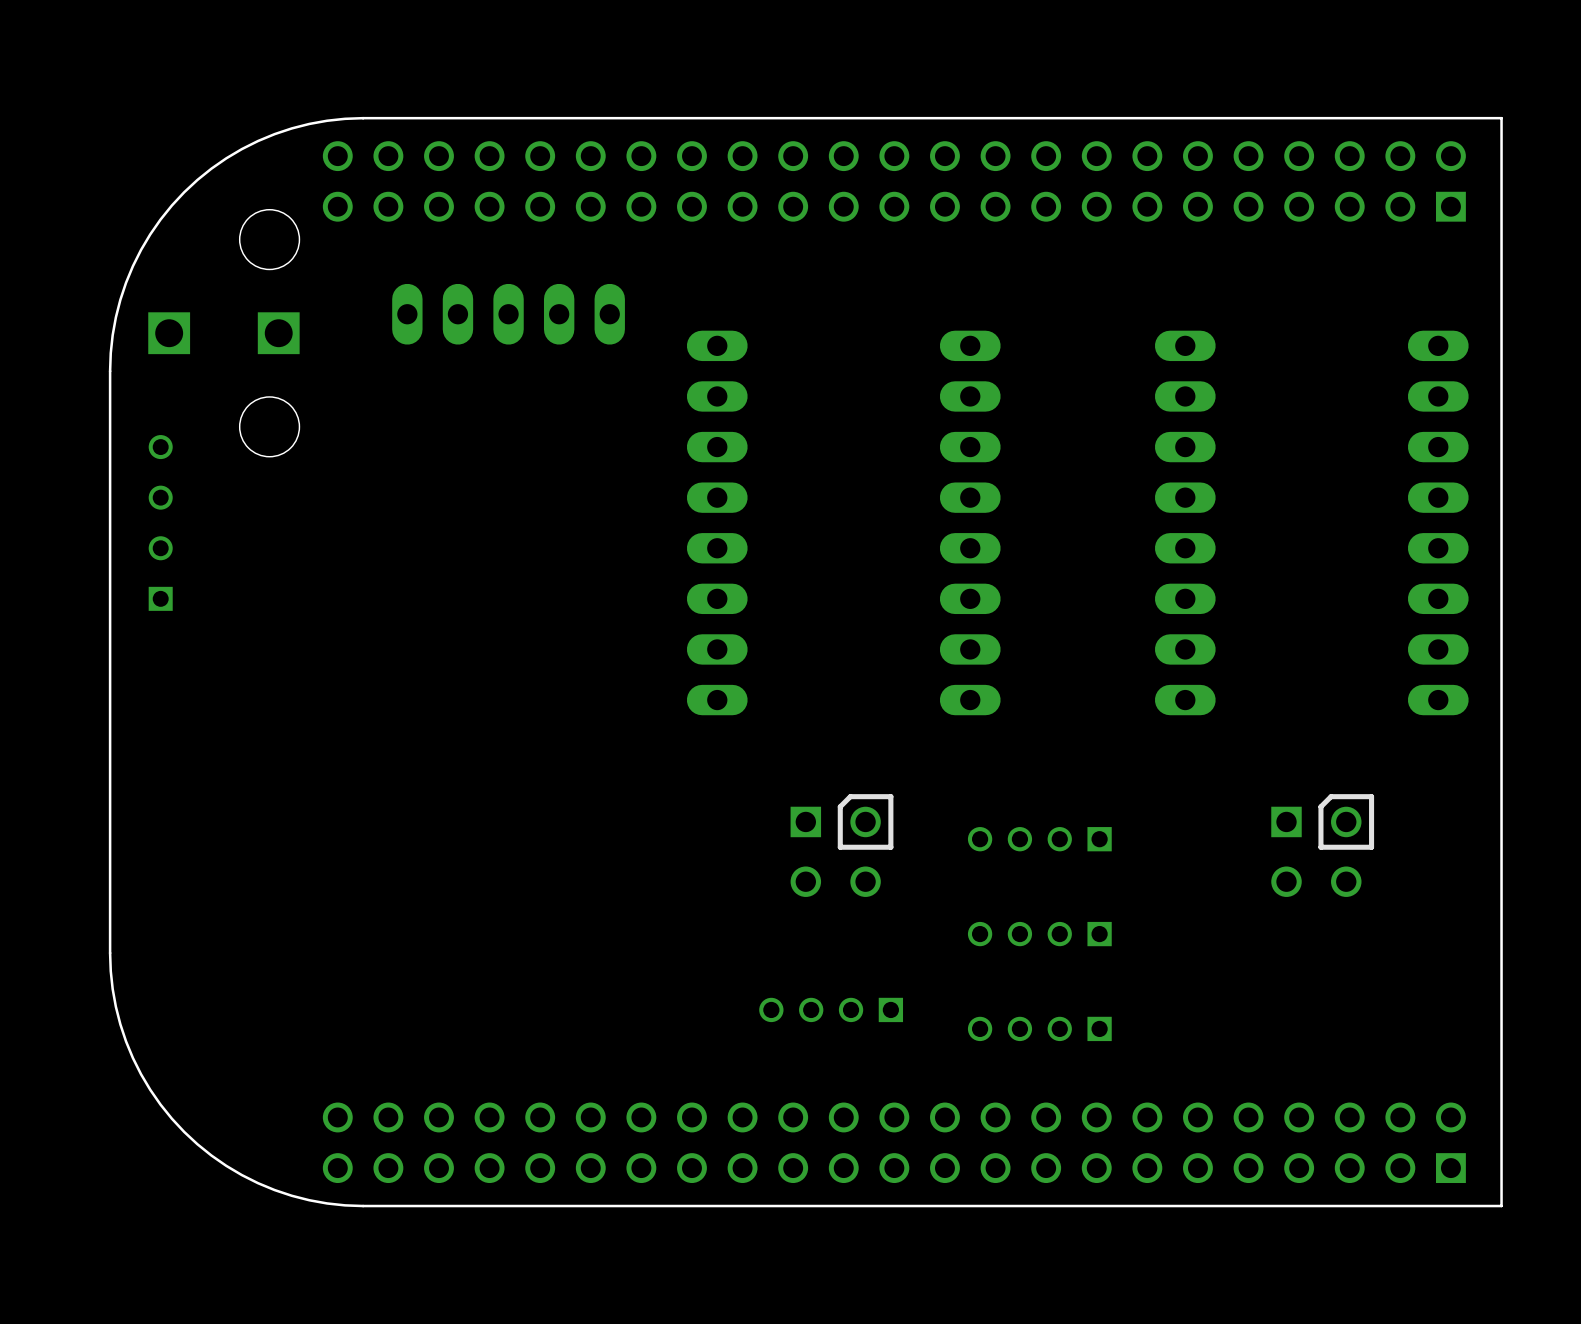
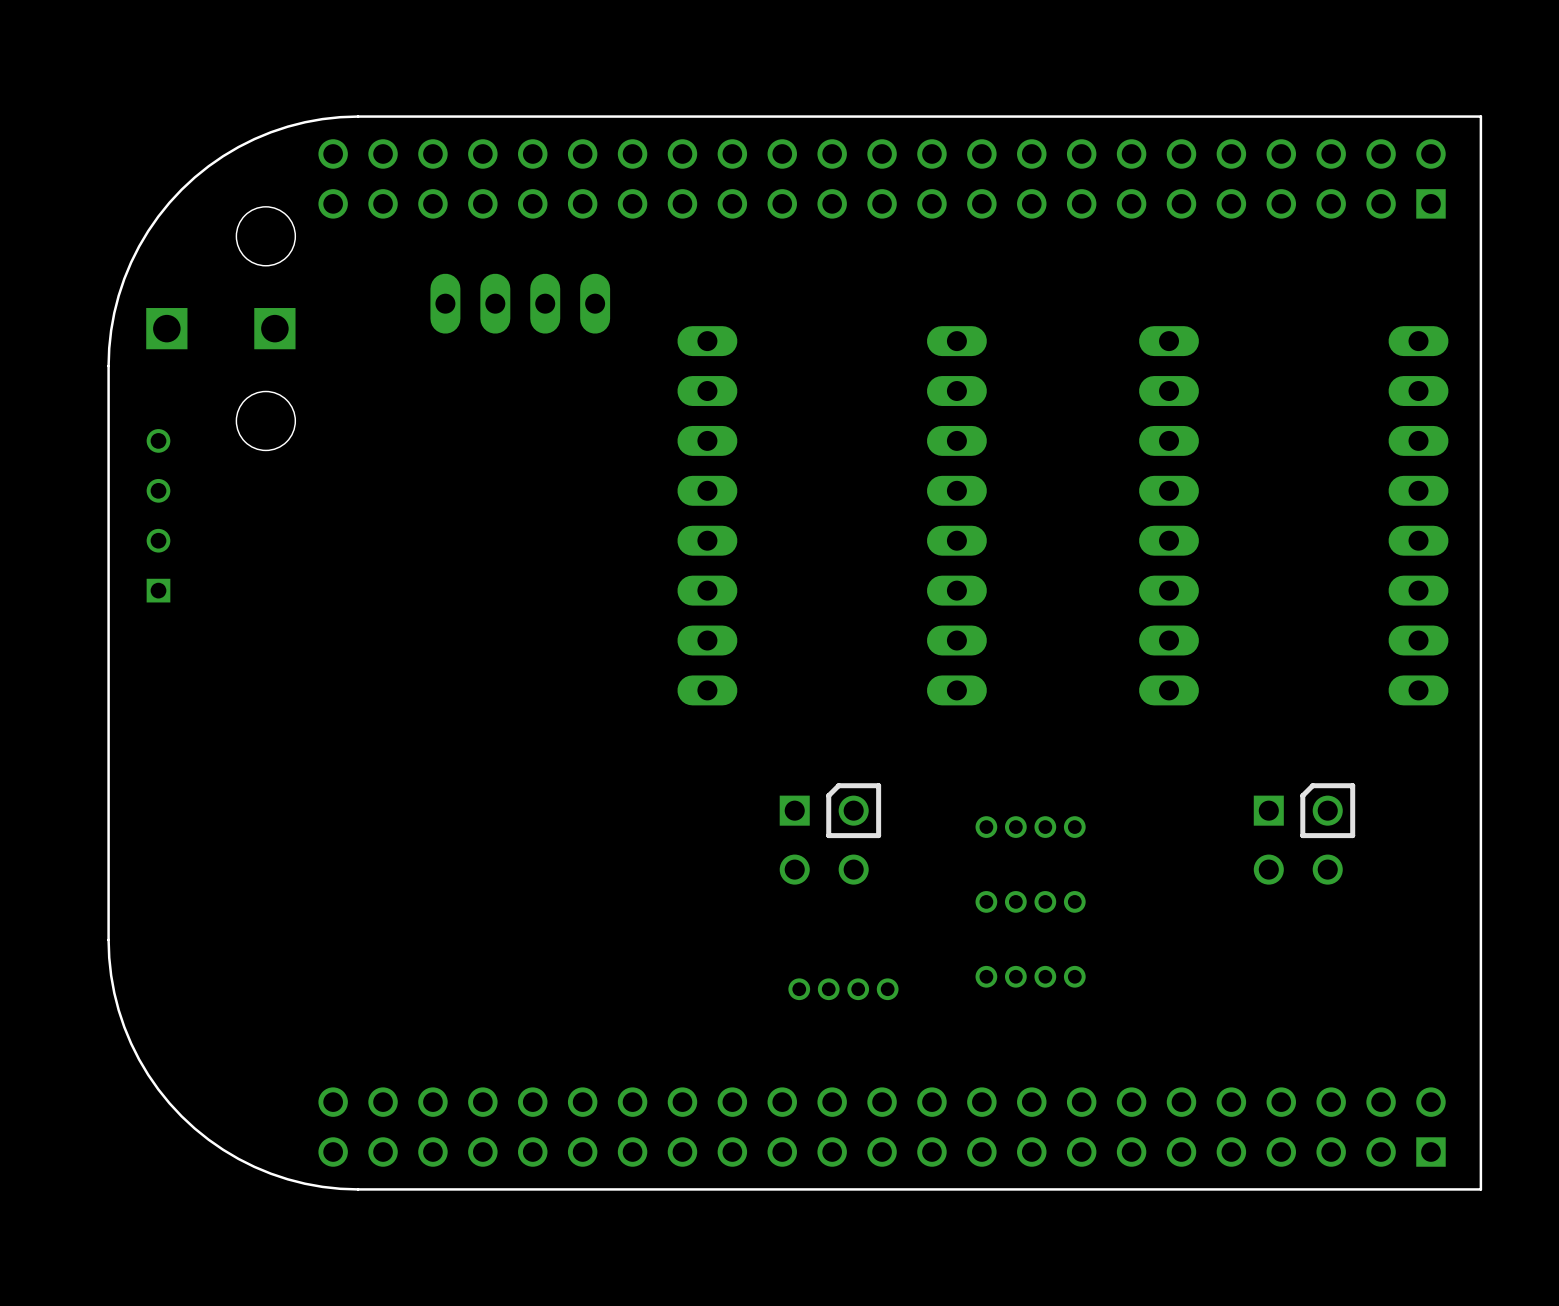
part: none -> (520, 303)
part: (508, 314) -> none
part footprint: [967, 827, 1112, 852] -> [975, 816, 1086, 838]
part: none -> (1030, 901)
part: (1039, 934) -> none
part: none -> (1030, 976)
part: none -> (843, 989)
part: (831, 1009) -> none
part: (1039, 1028) -> none

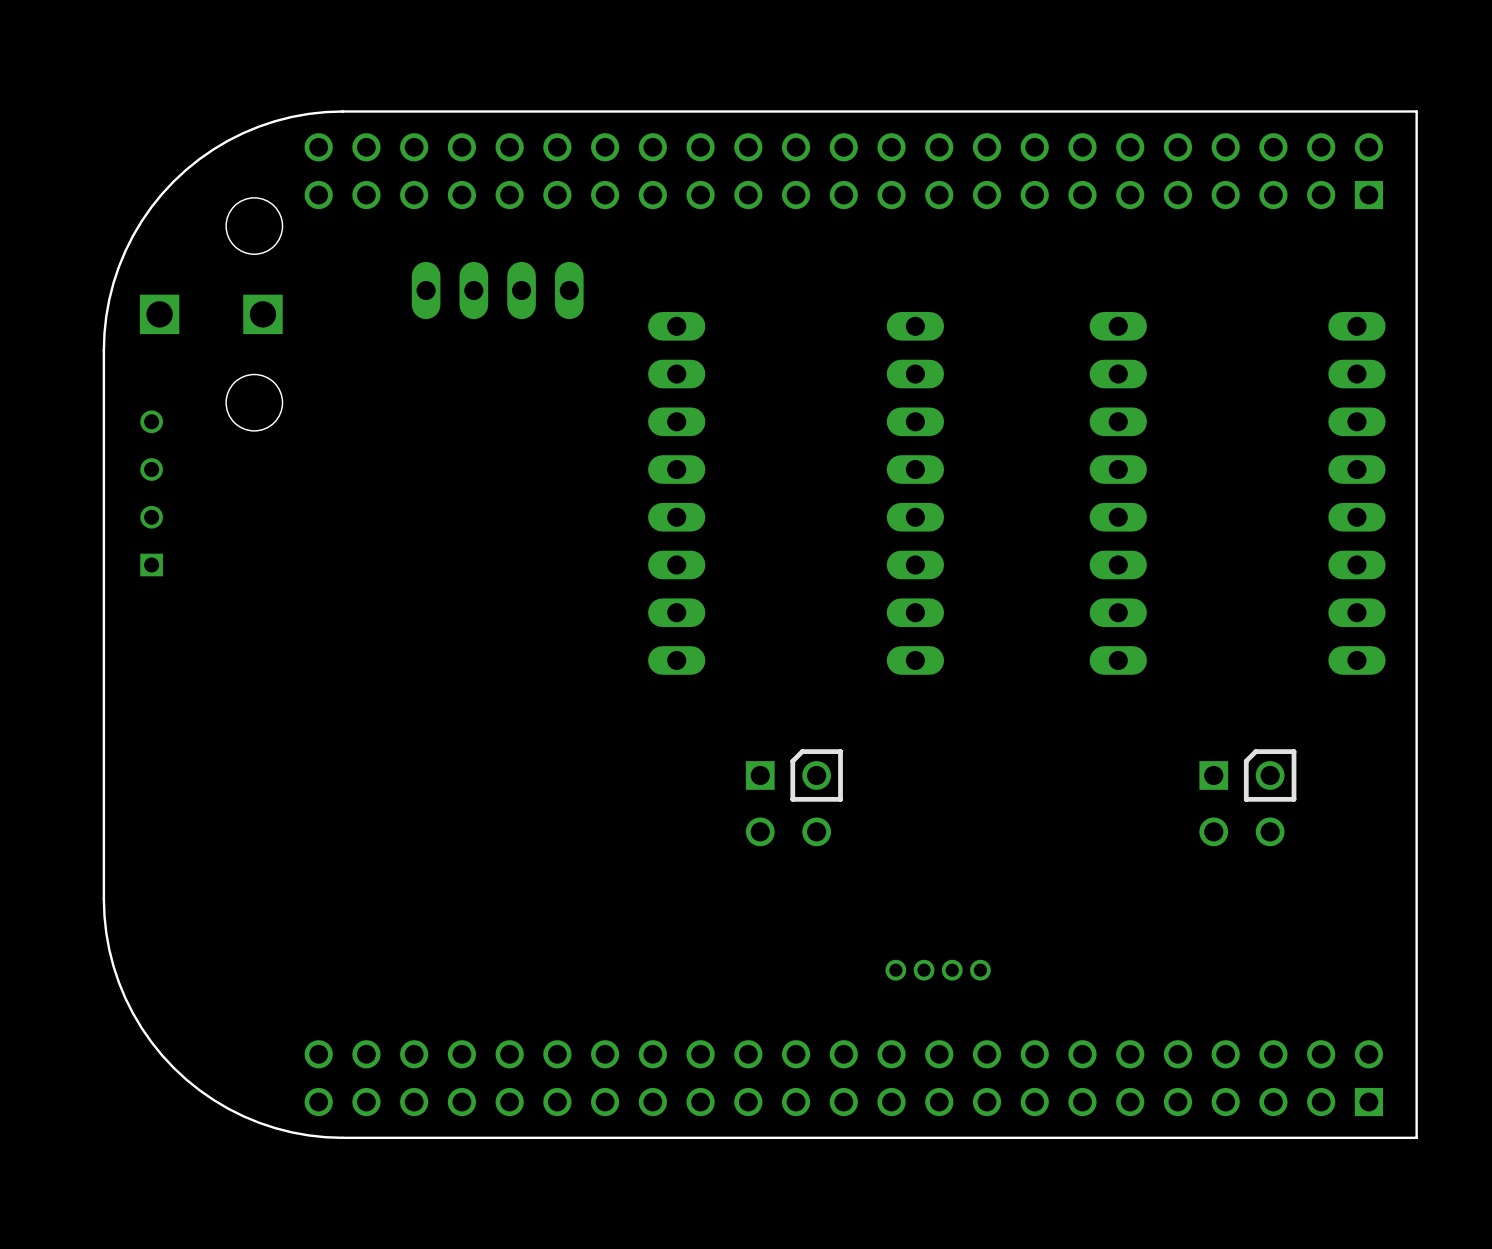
part: (1030, 827) -> none
part: (1030, 901) -> none
part: (1030, 976) -> none
part: (843, 989) -> none
part: none -> (938, 970)

